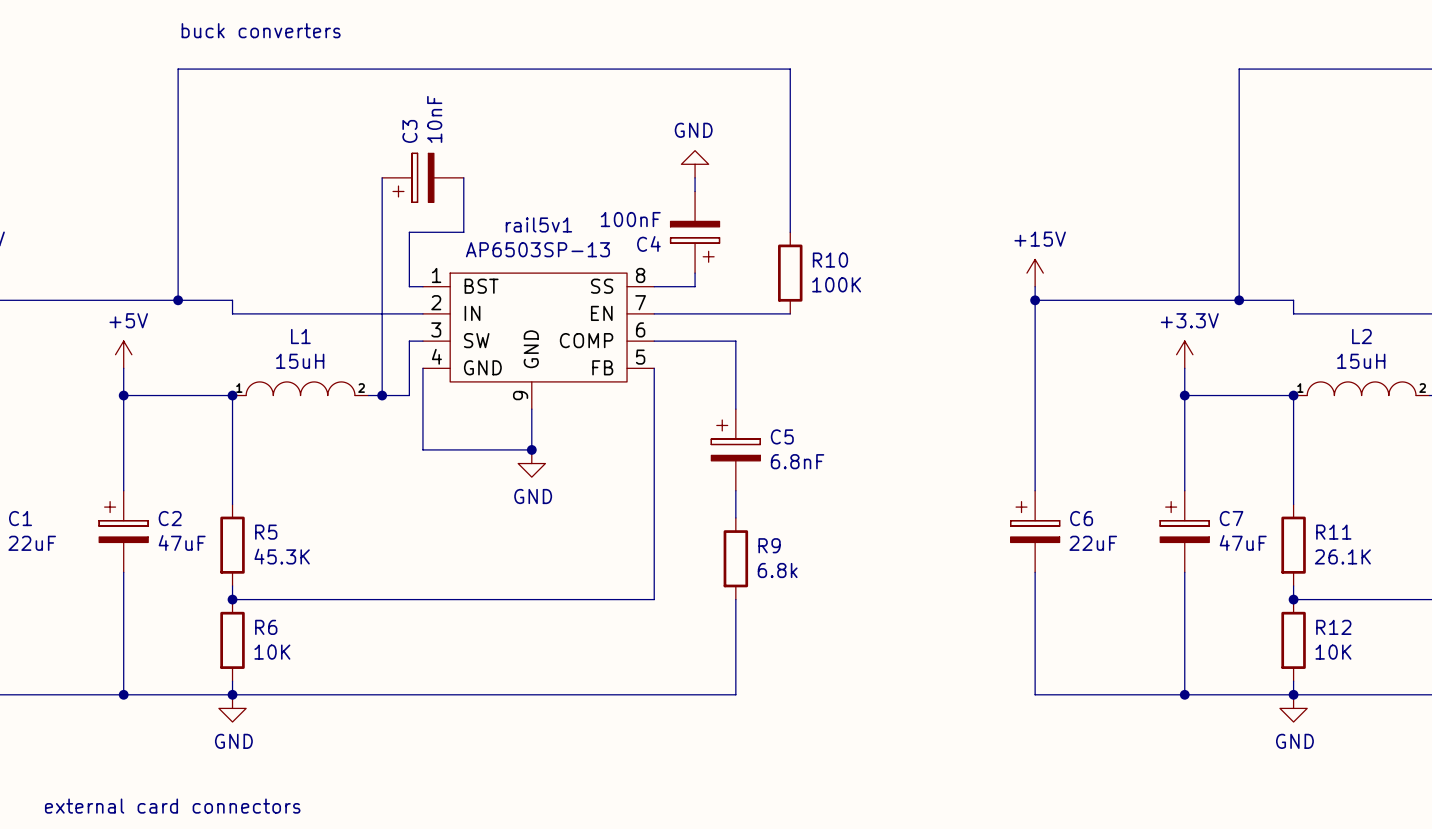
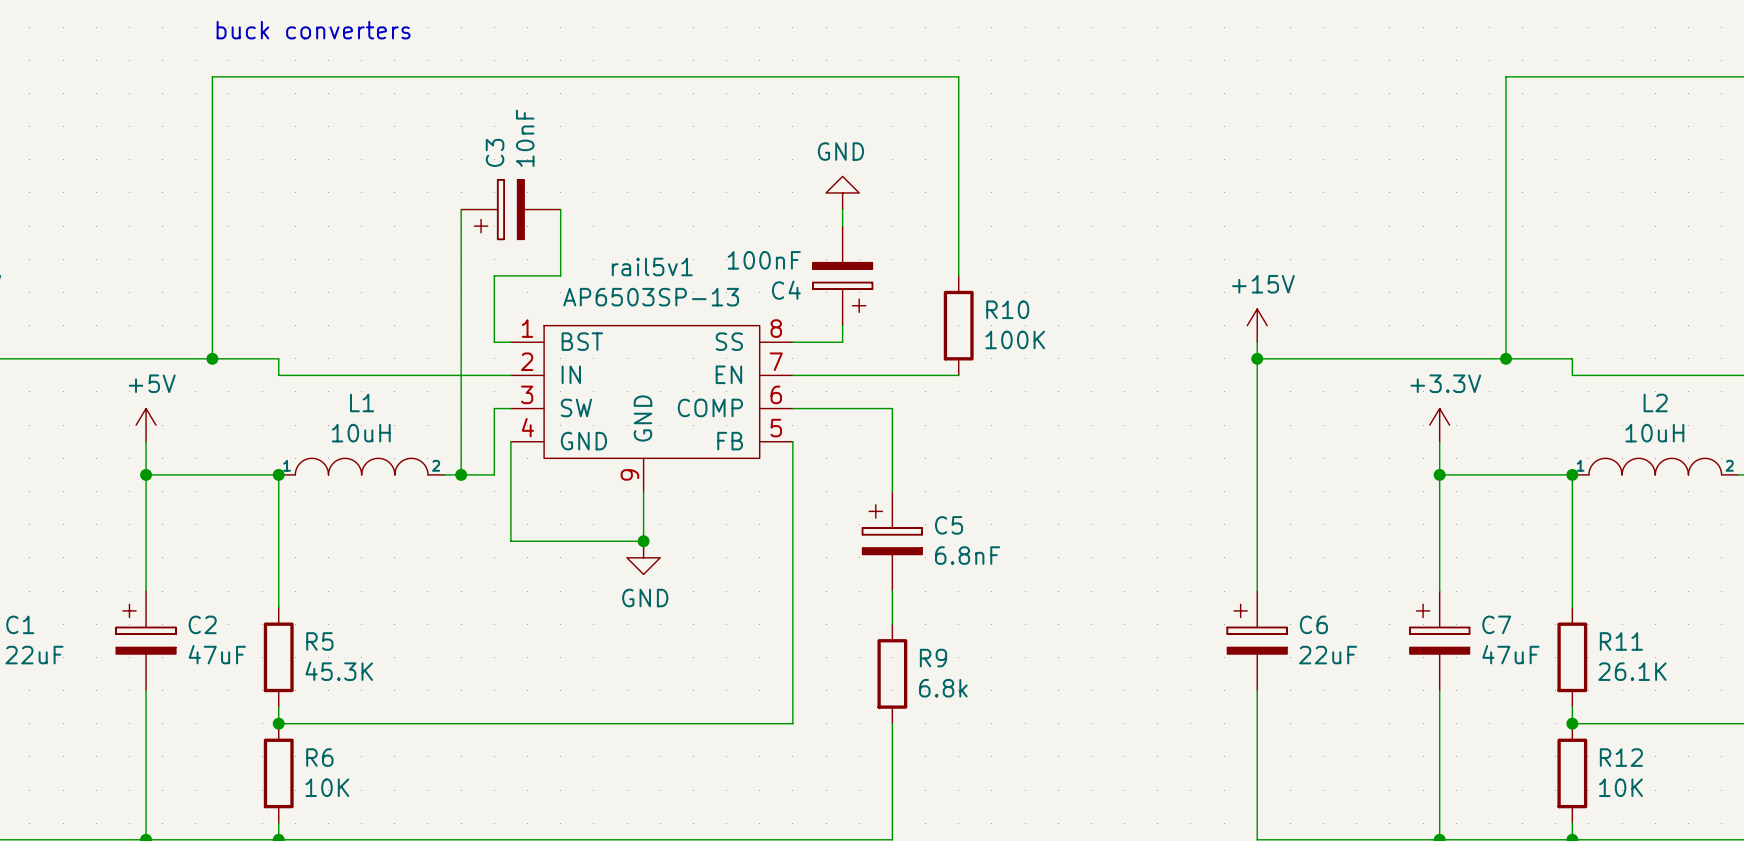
L1 value: 15uH (300, 361) -> 10uH (361, 433)
L2 value: 15uH (1361, 361) -> 10uH (1654, 433)

